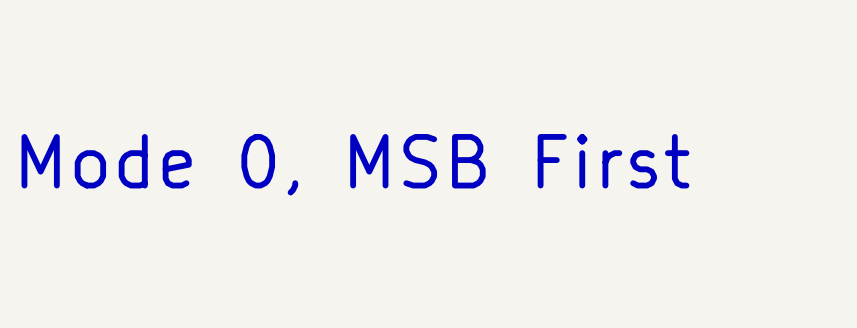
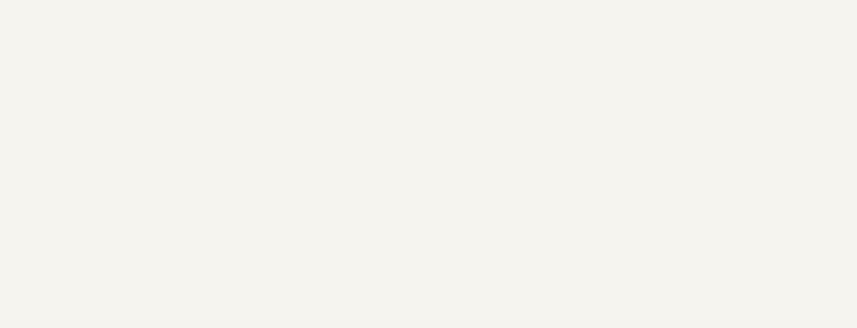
text: Mode 0, MSB First (355, 164) -> none

